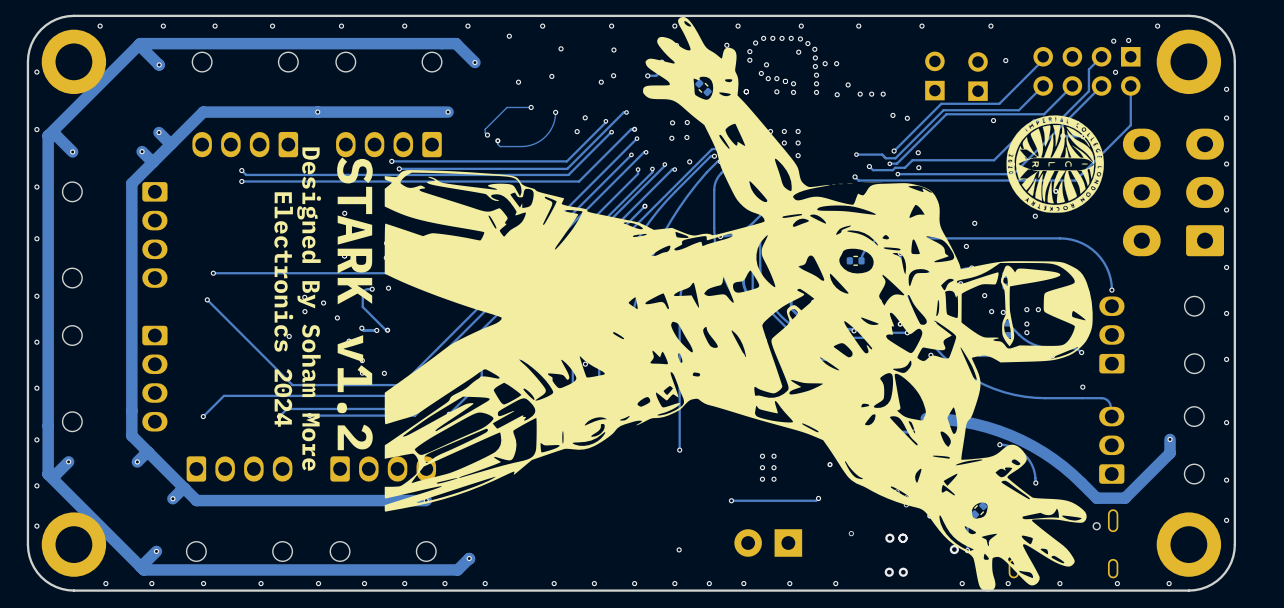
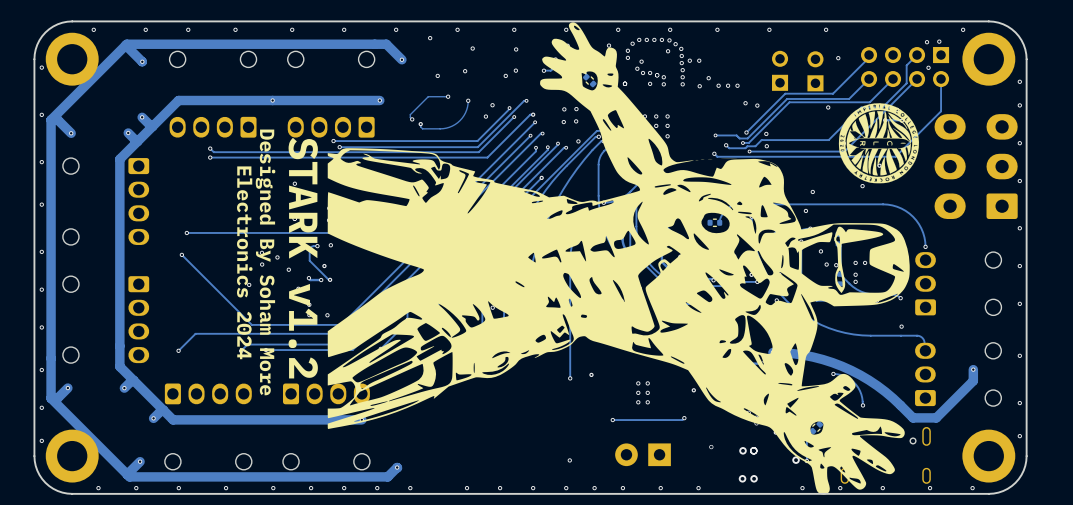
via: none -> (324, 266)
via: none -> (591, 374)

